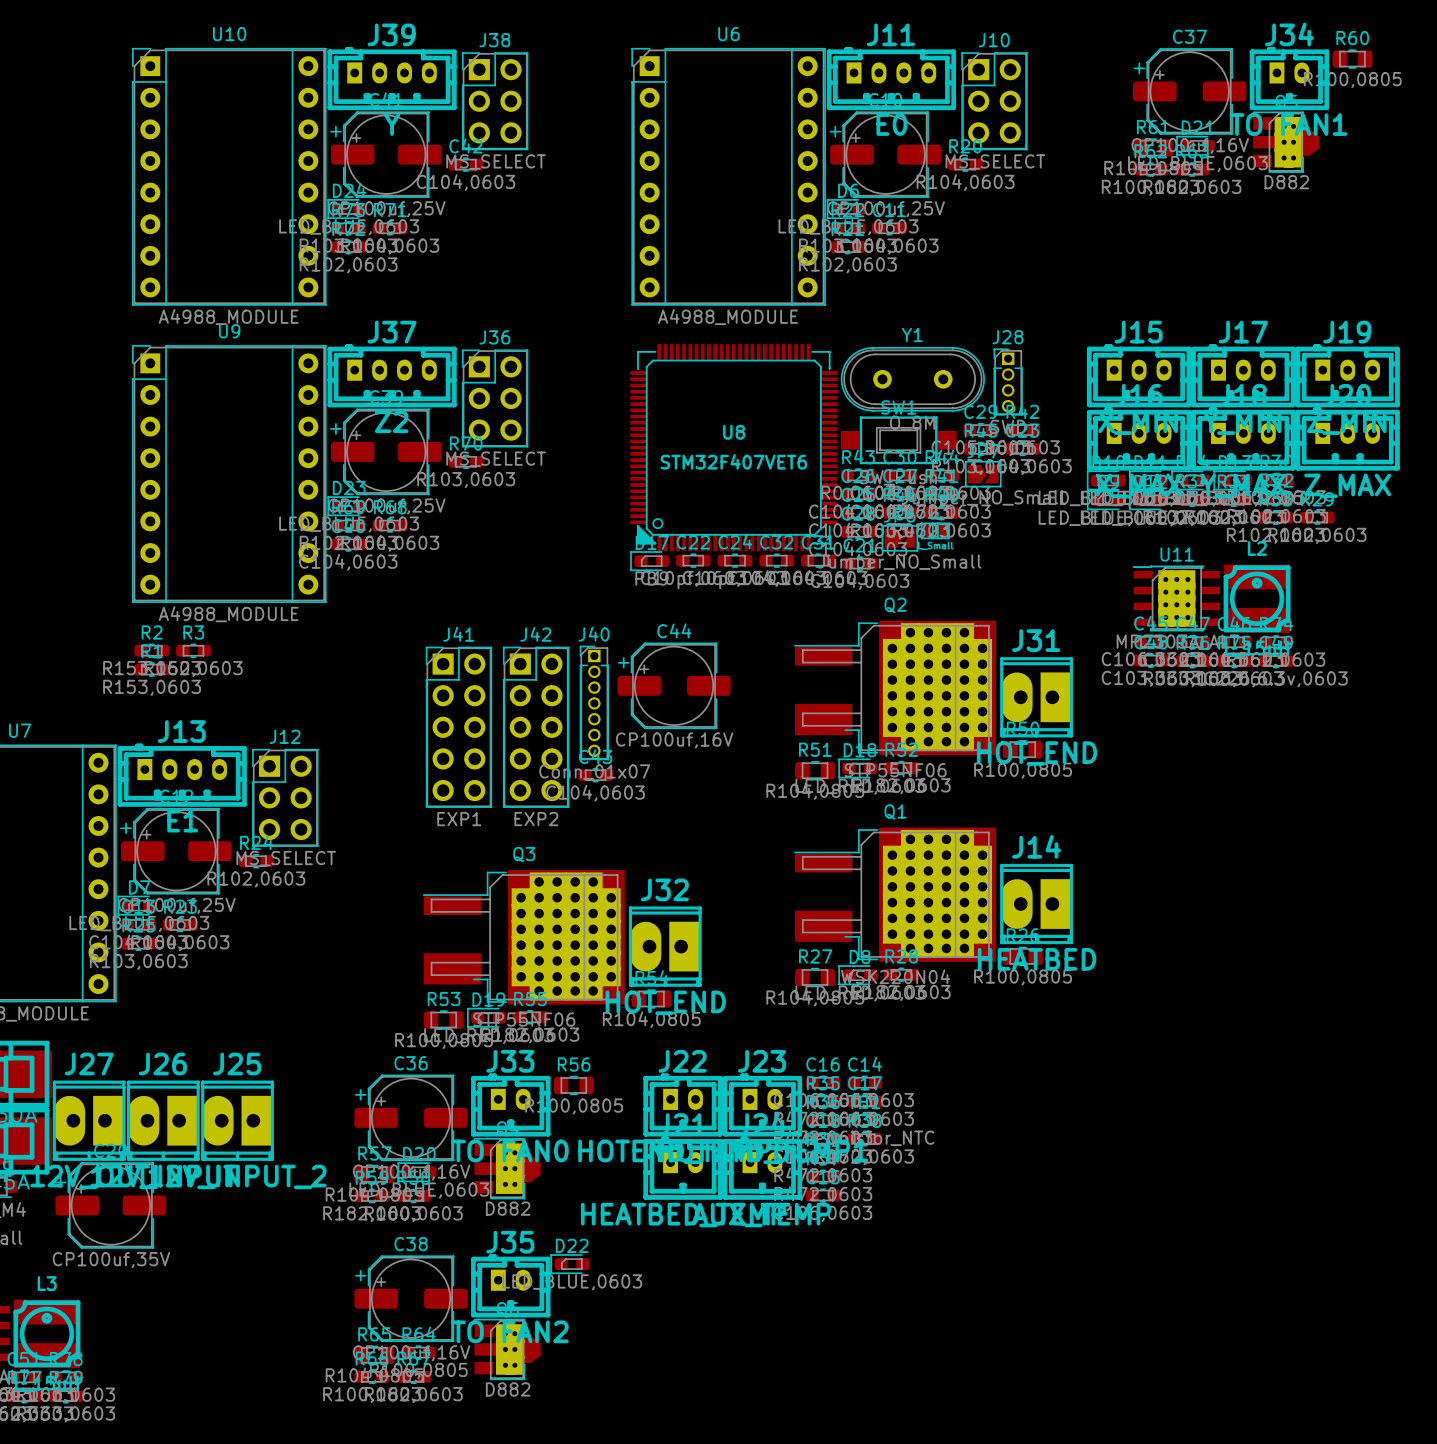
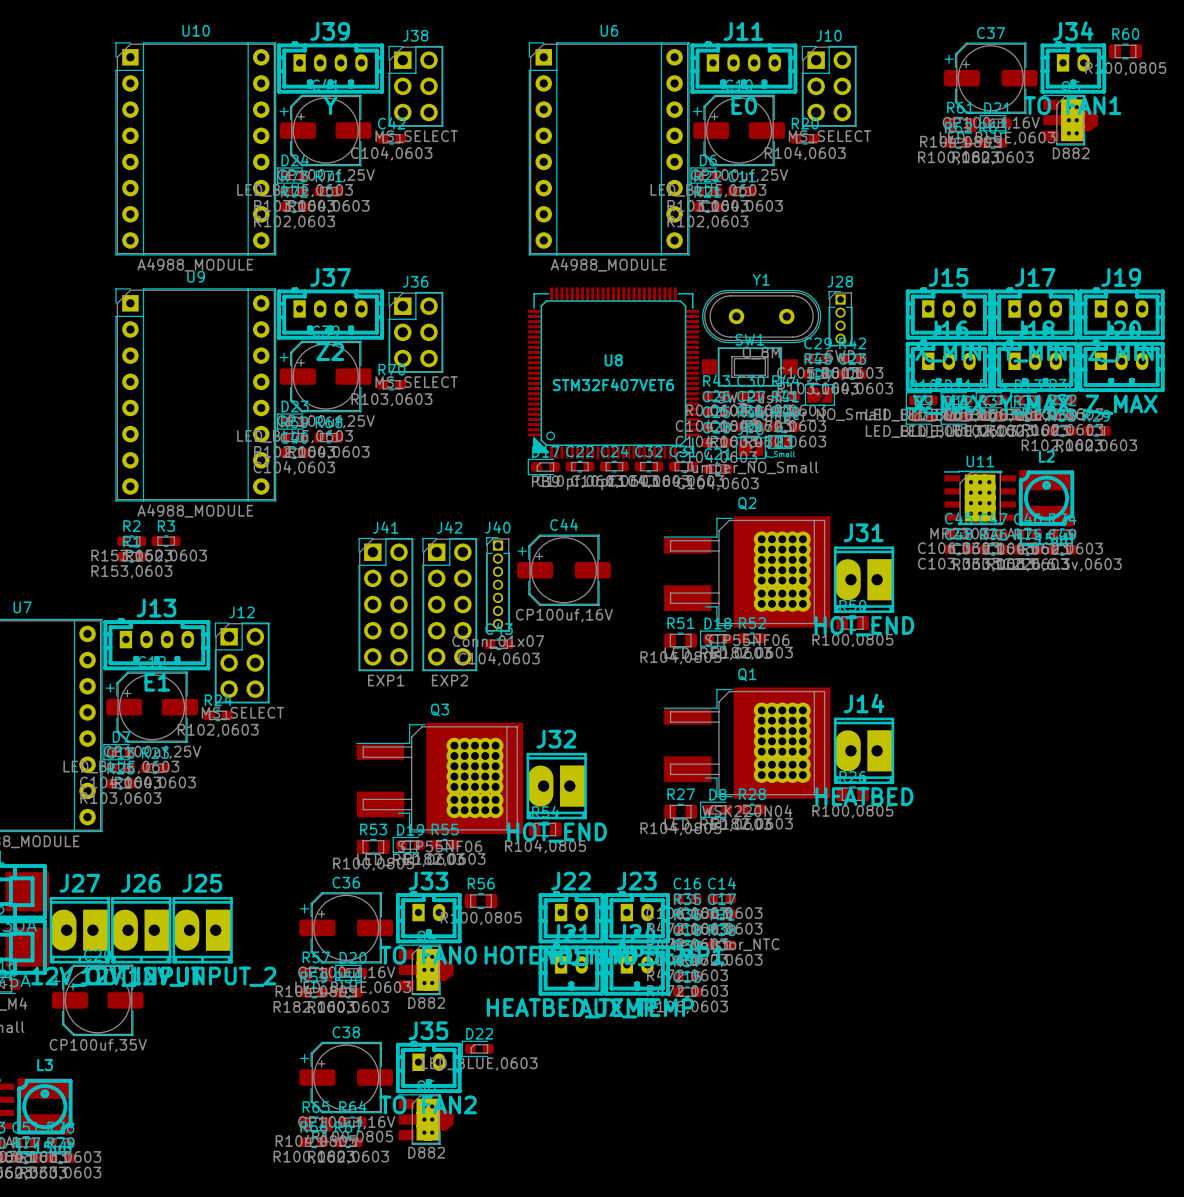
Q2 footprint: [794, 620, 997, 756] -> [663, 516, 831, 628]
Q1 footprint: [794, 827, 997, 962] -> [663, 687, 831, 799]
Q3 footprint: [423, 870, 625, 1005] -> [356, 722, 524, 834]

